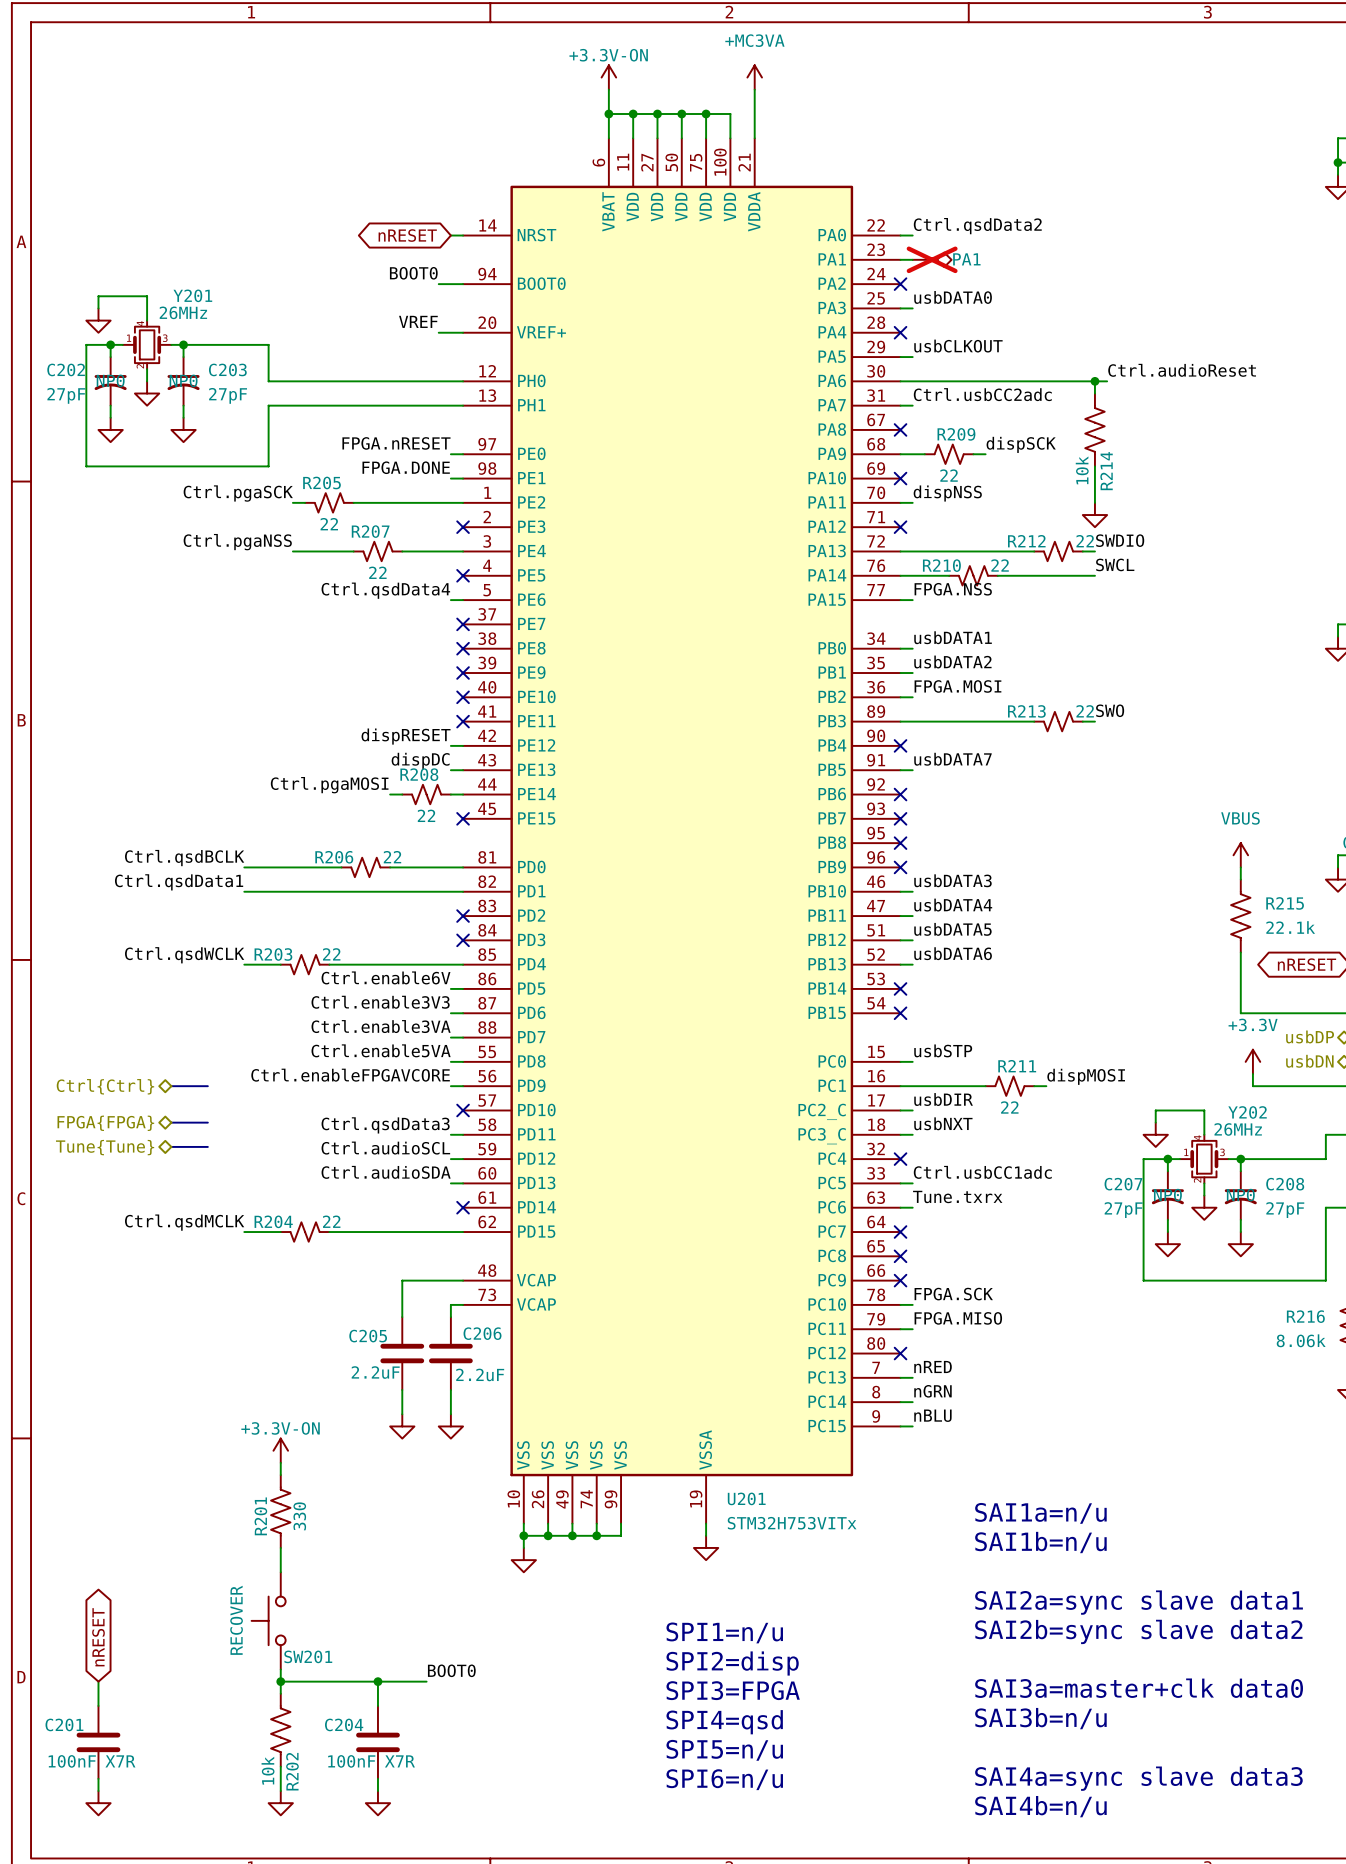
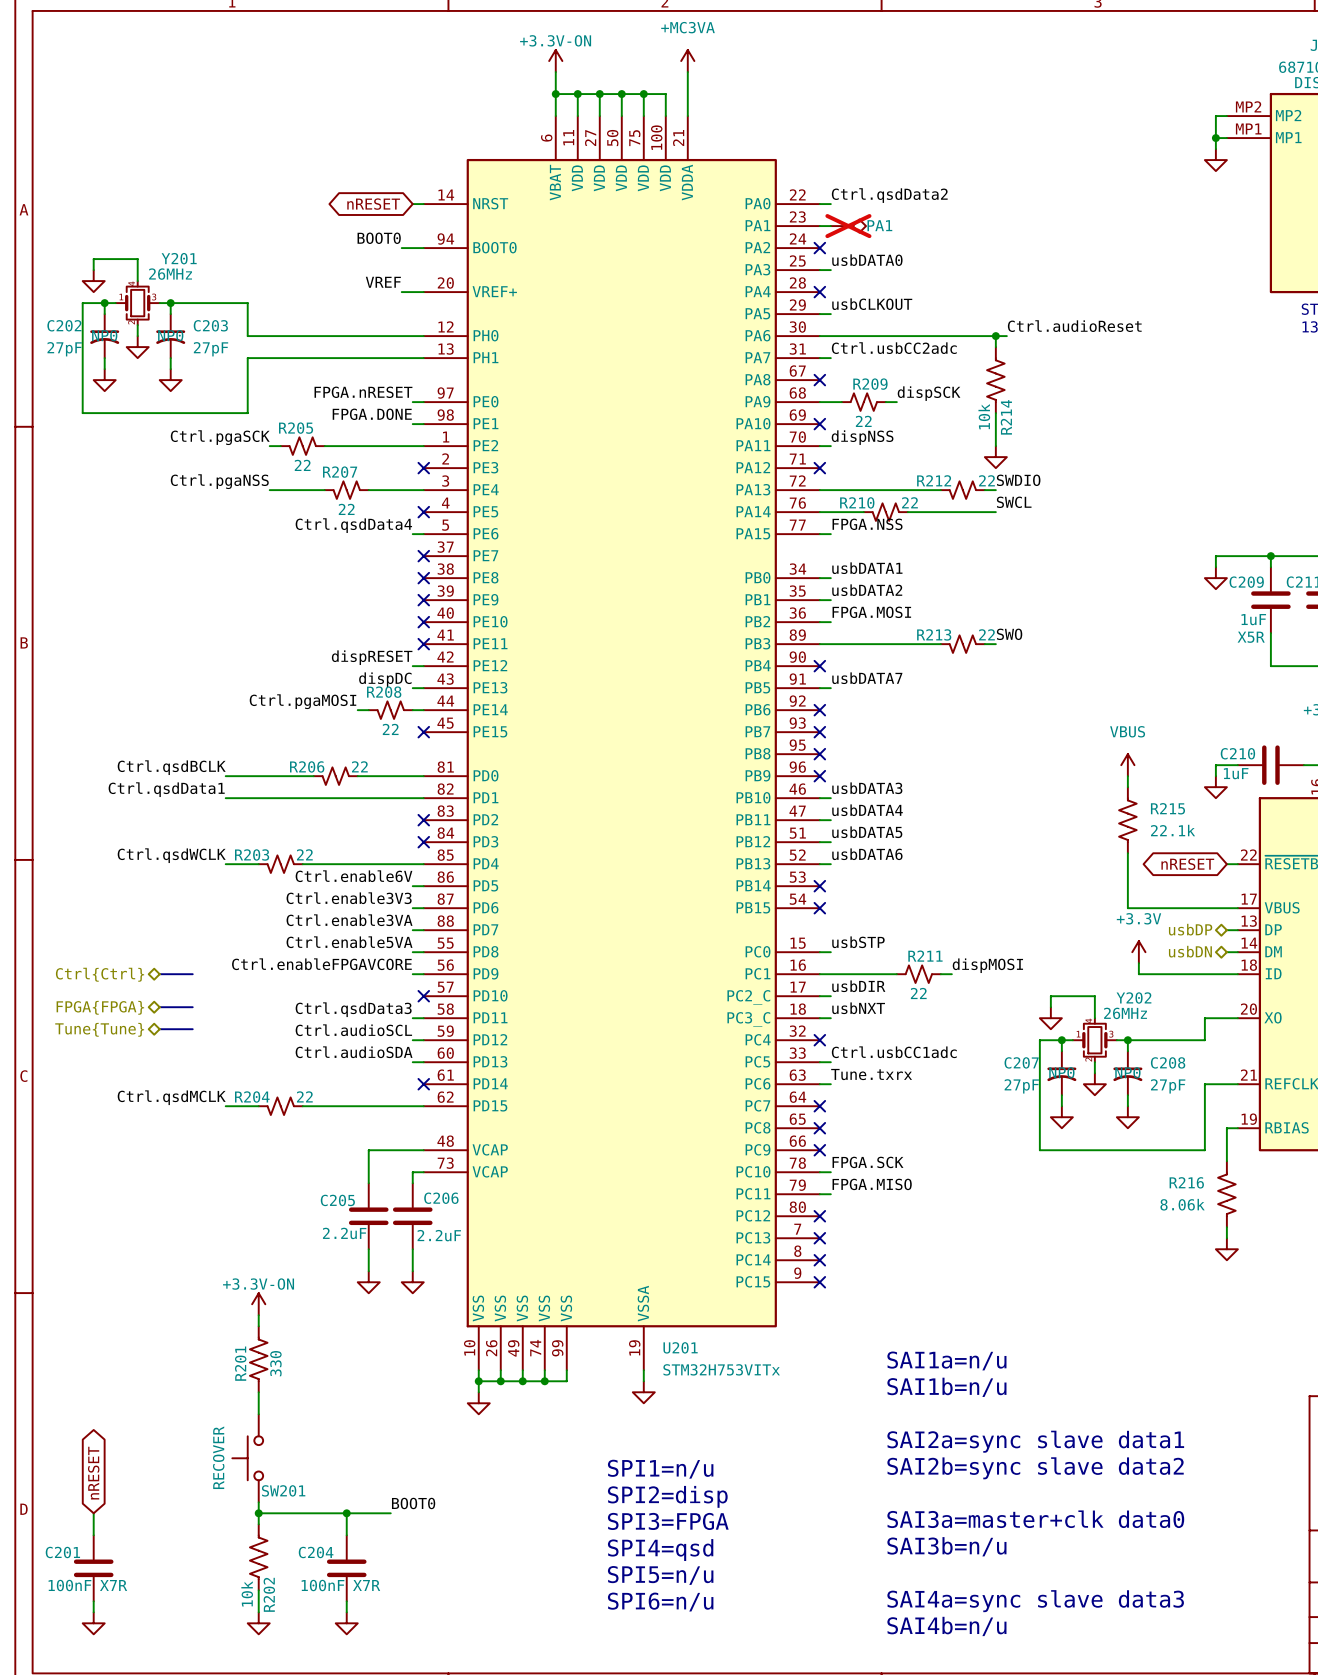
label: nRED (933, 1366) -> none
wire: (900, 1377) (912, 1377) -> none
no-connect mark: none -> (819, 1238)
label: nGRN (932, 1391) -> none
wire: (900, 1402) (912, 1402) -> none
no-connect mark: none -> (819, 1260)
label: nBLU (932, 1415) -> none
wire: (900, 1426) (912, 1426) -> none
no-connect mark: none -> (819, 1282)

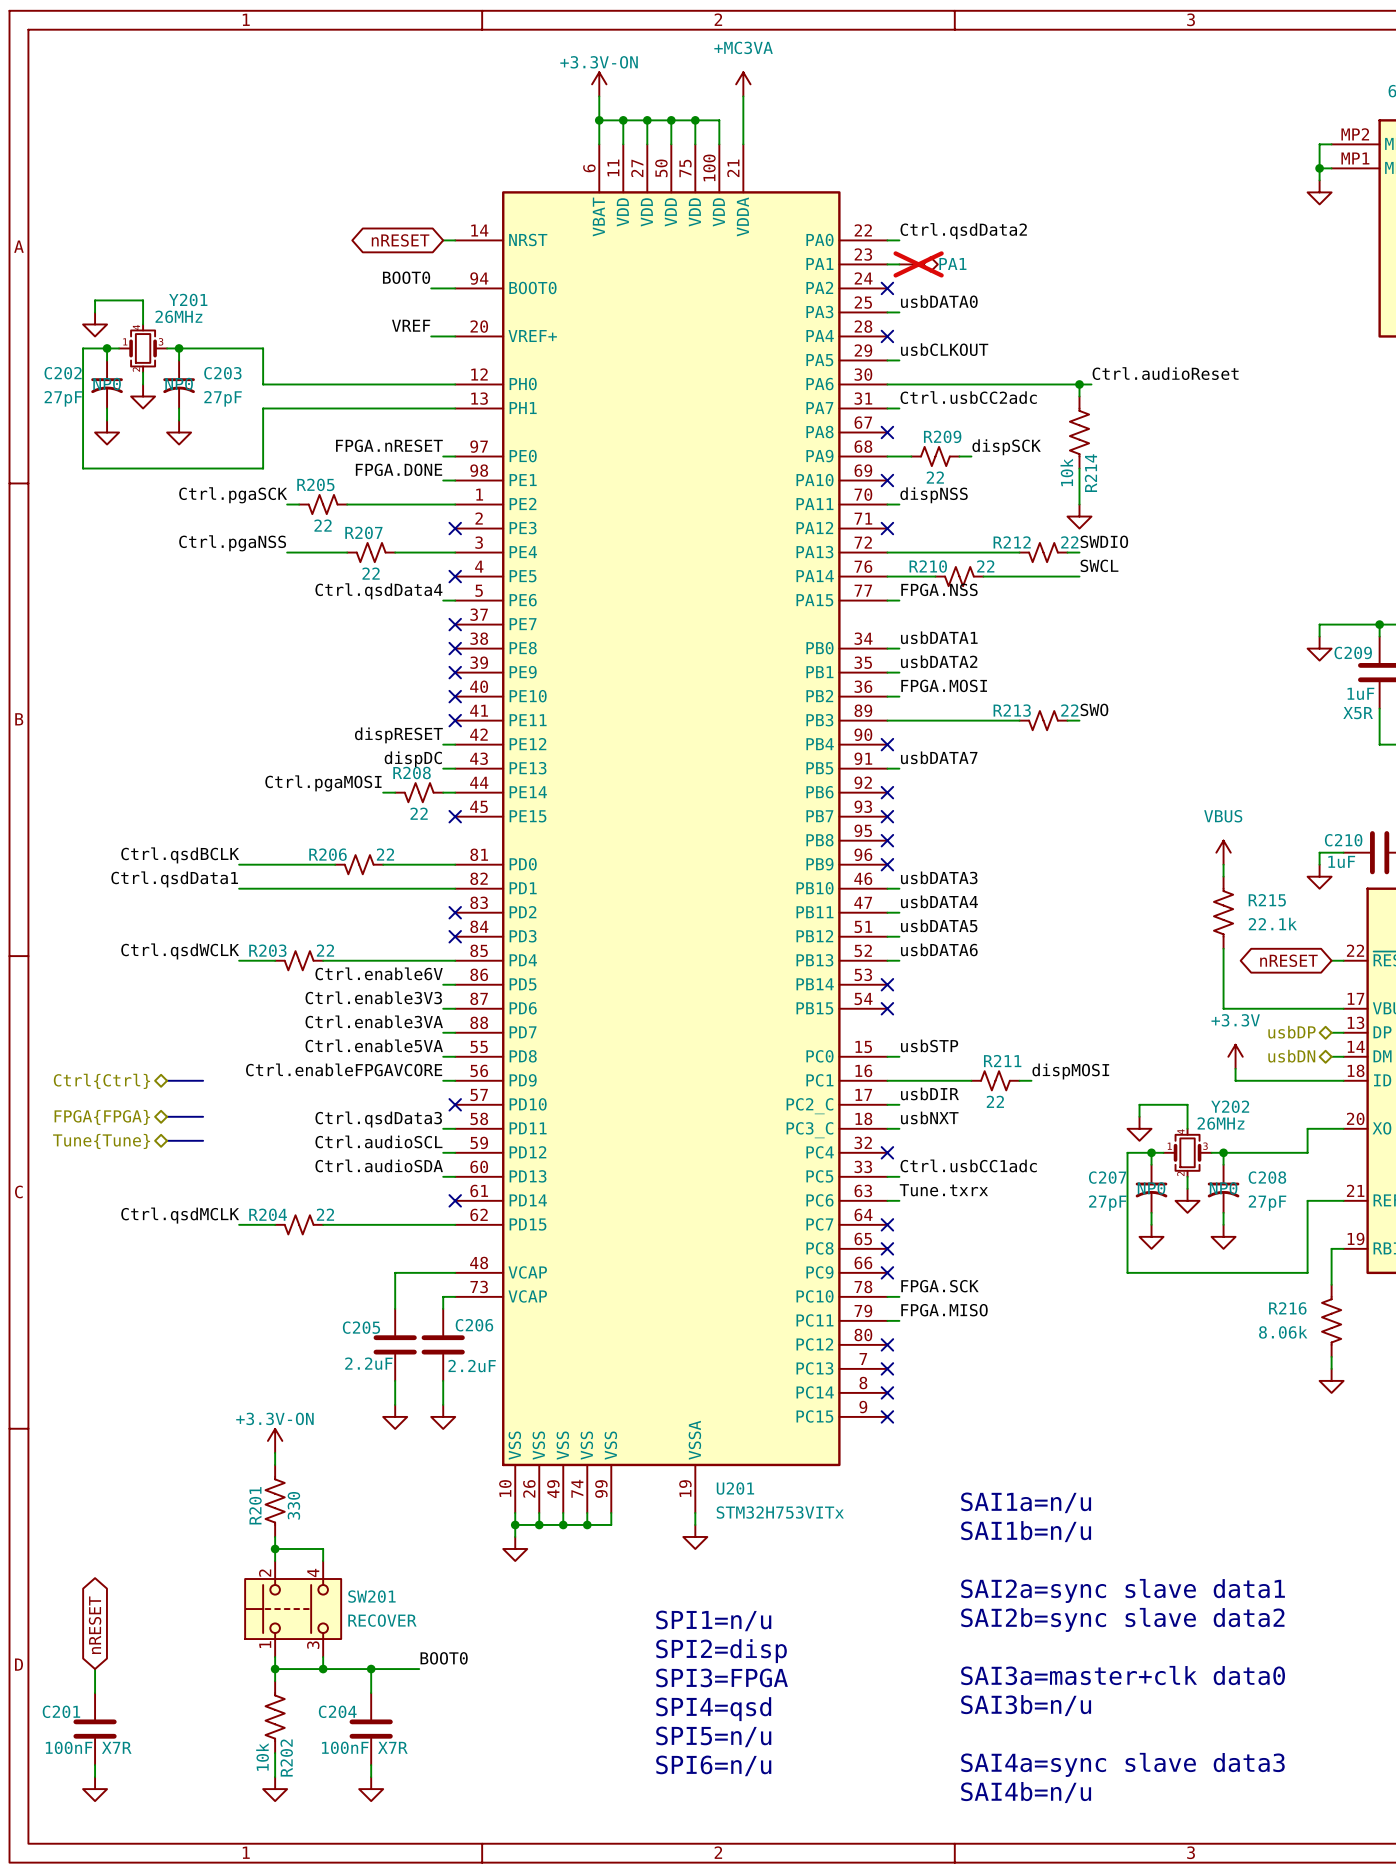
wire: none -> (275, 1548) (323, 1548) (323, 1561)
junction: none -> (275, 1548)
SW201 symbol: [232, 1414, 264, 1503] -> [245, 1561, 342, 1658]
SW201 text: RECOVER (218, 1457) -> none
SW201 value: none -> RECOVER (382, 1620)
SW201 name position: SW201 (283, 1490) -> SW201 (371, 1596)
wire: none -> (323, 1657) (323, 1669)
junction: none -> (323, 1669)

